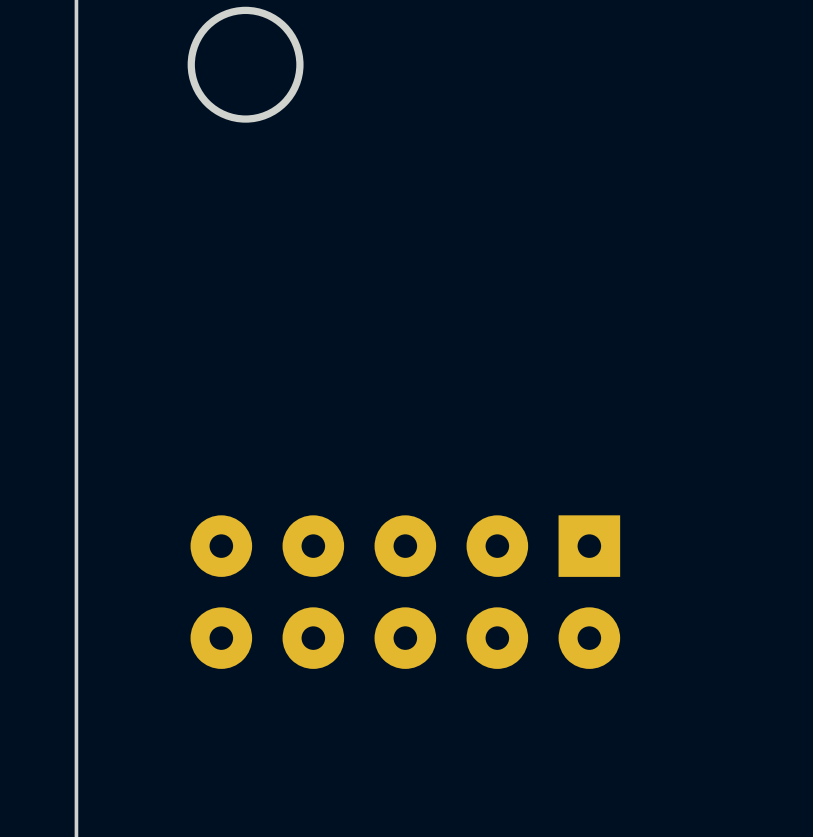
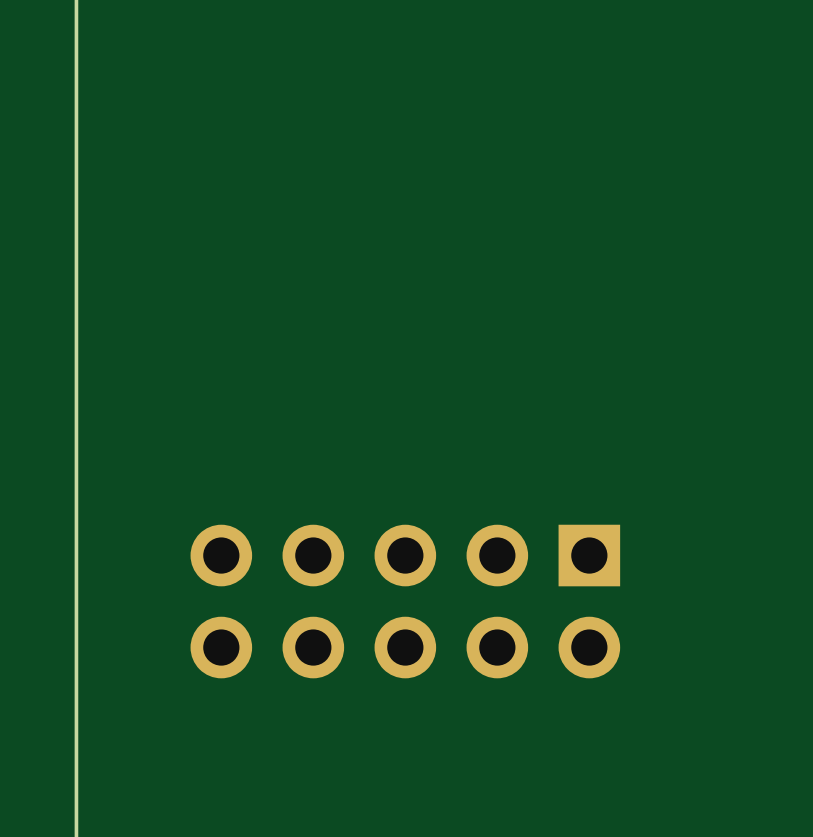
round board edge: [187, 6, 304, 123] -> none
part footprint: [190, 515, 621, 669] -> [190, 524, 621, 679]

